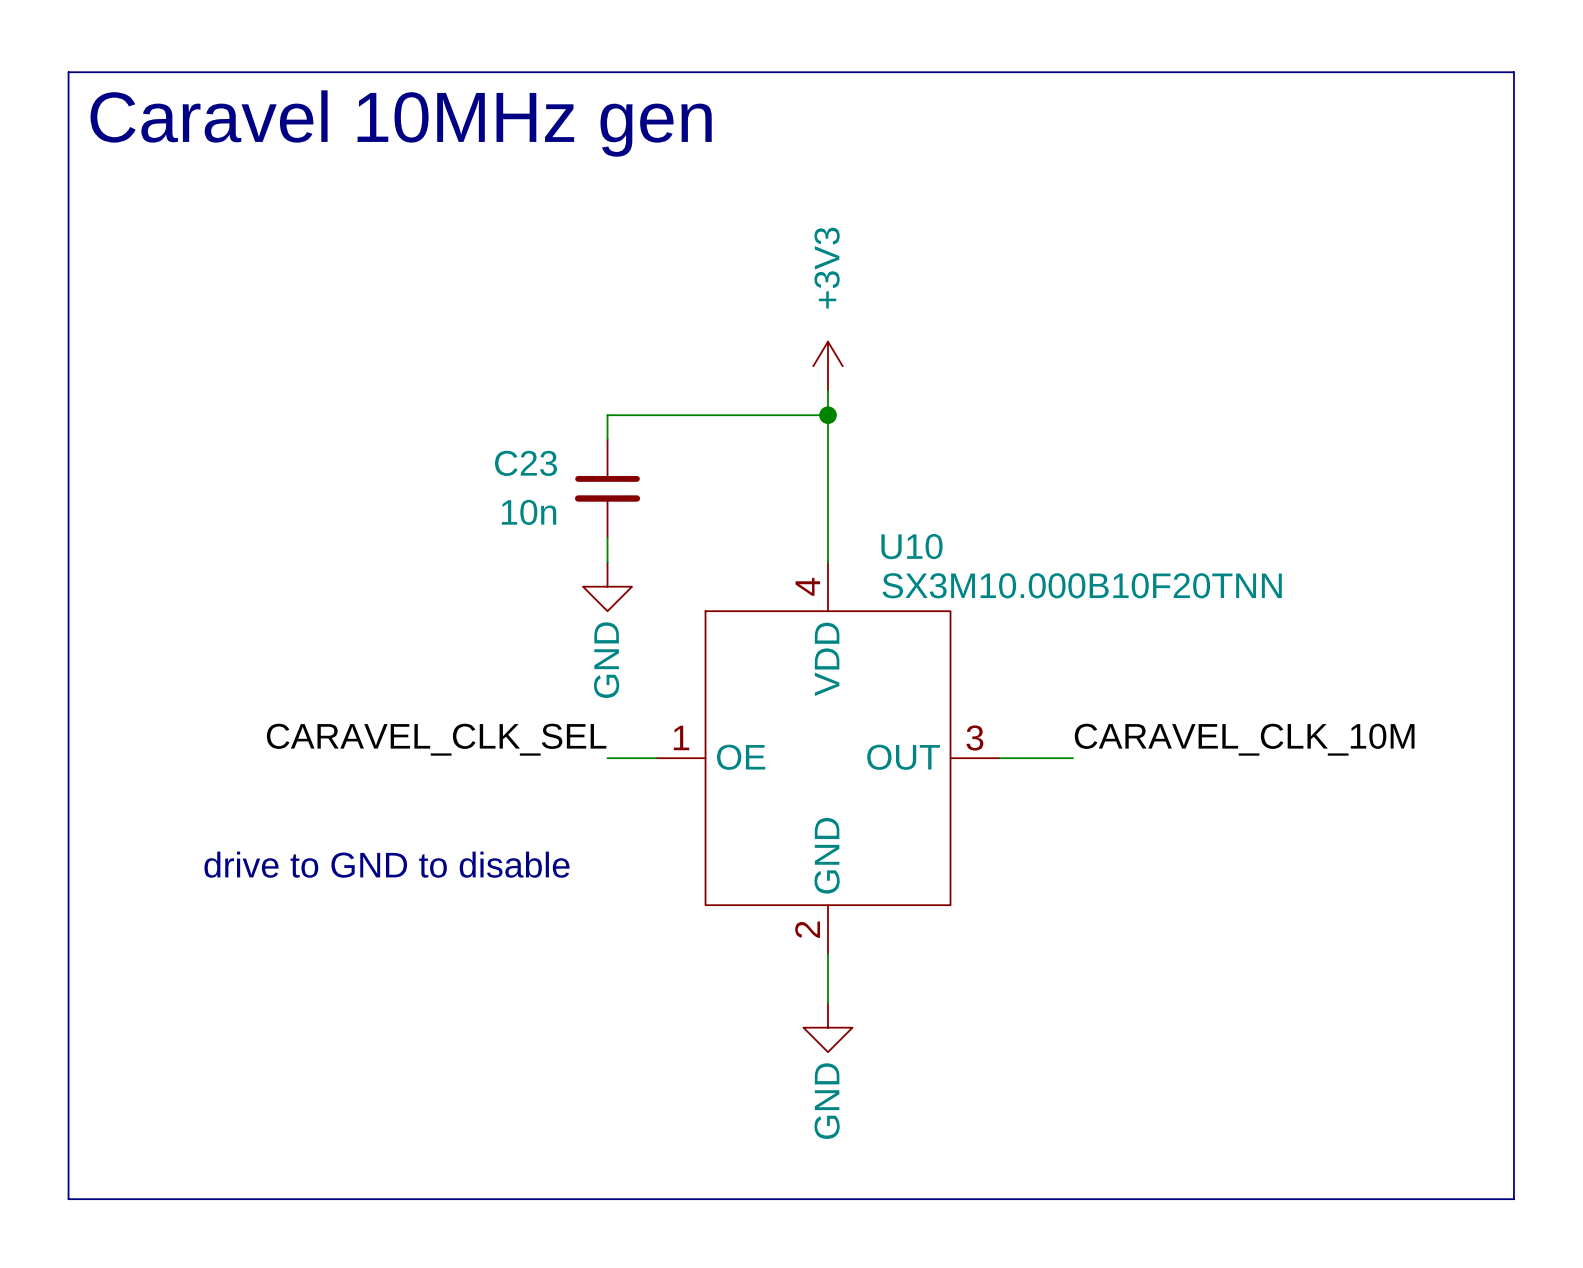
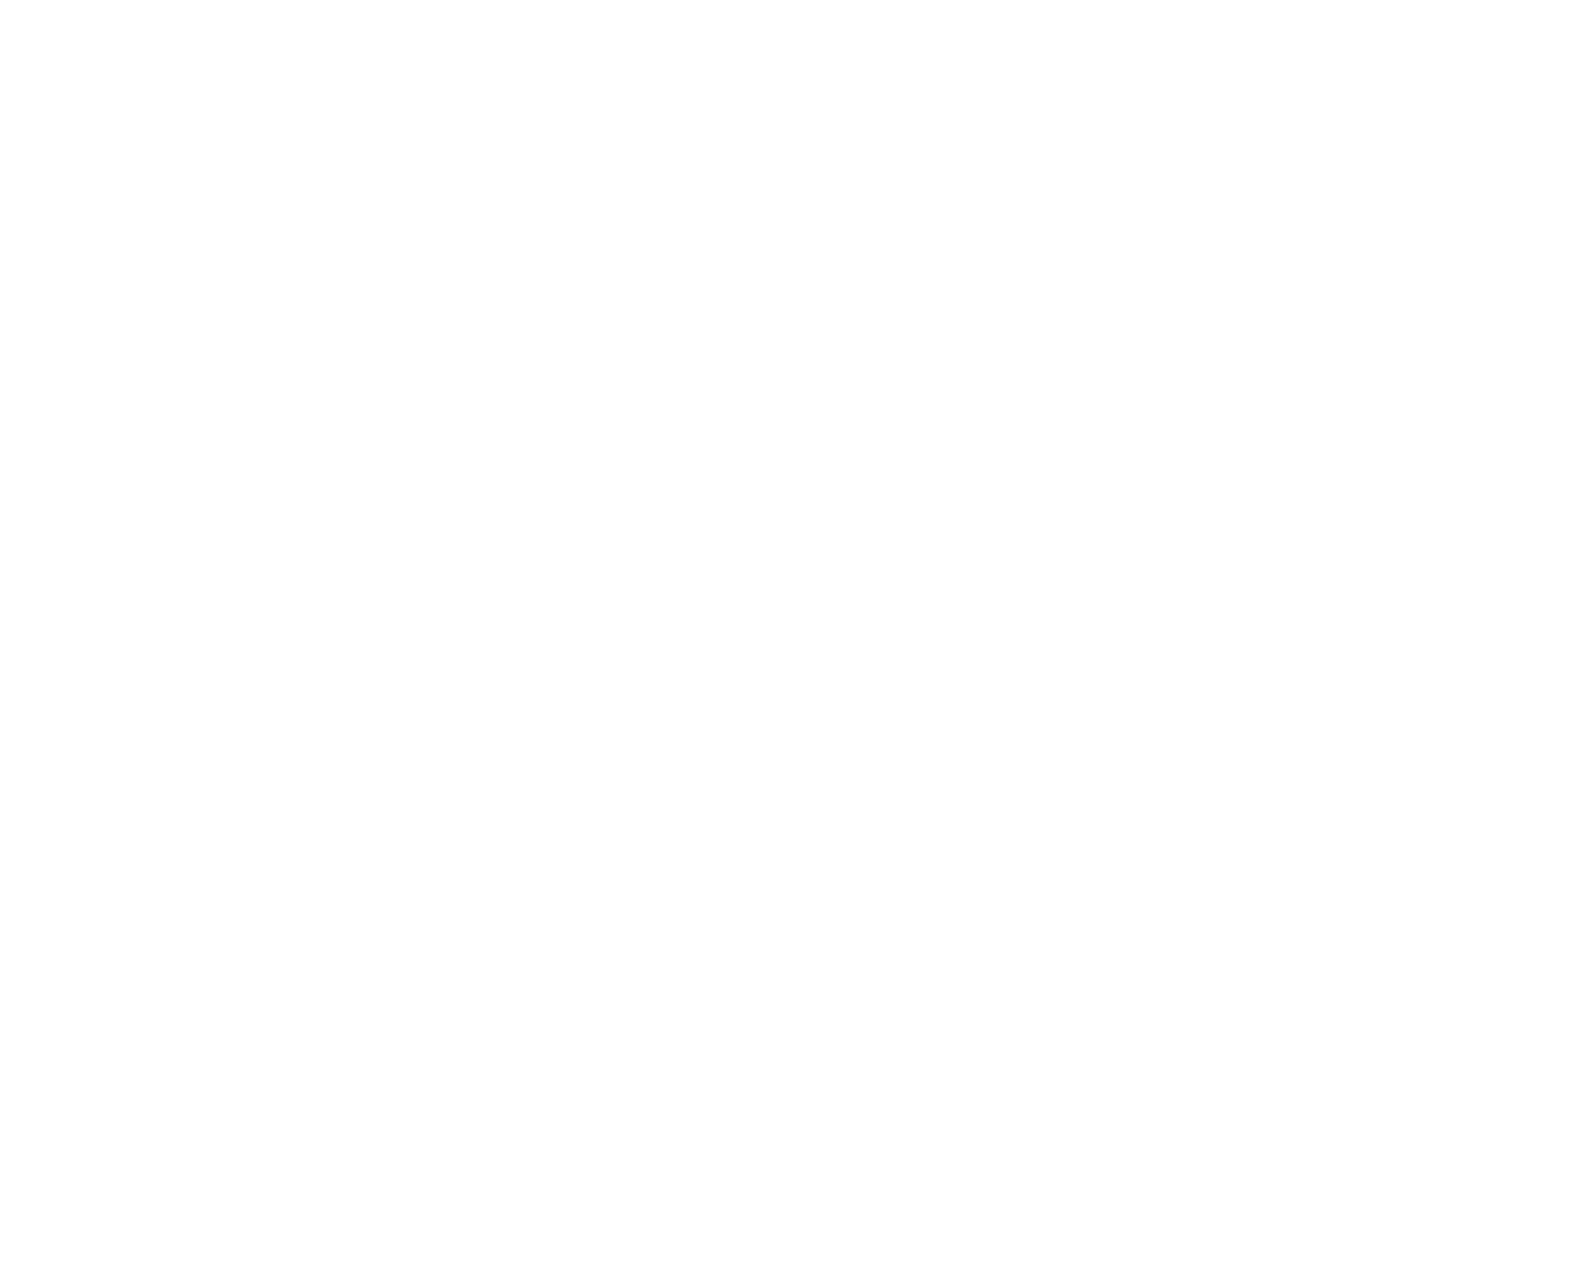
line: (68, 72) (1513, 72) (1513, 1199) (68, 1199) (68, 72) -> none
text: Caravel 10MHz gen (401, 123) -> none
power symbol: +3V3 (828, 366) -> none
wire: (828, 390) (828, 562) -> none
wire: (828, 415) (607, 415) (607, 439) -> none
junction: (828, 415) -> none
C23: 10n (607, 488) -> none
wire: (607, 537) (607, 562) -> none
power symbol: GND (607, 586) -> none
label: CARAVEL_CLK_SEL (436, 739) -> none
label: CARAVEL_CLK_10M (1244, 739) -> none
wire: (607, 758) (656, 758) -> none
U10: SX3M10.000B10F20TNN (828, 758) -> none
wire: (999, 758) (1073, 758) -> none
text: drive to GND to disable (386, 864) -> none
wire: (828, 954) (828, 1003) -> none
power symbol: GND (828, 1027) -> none

